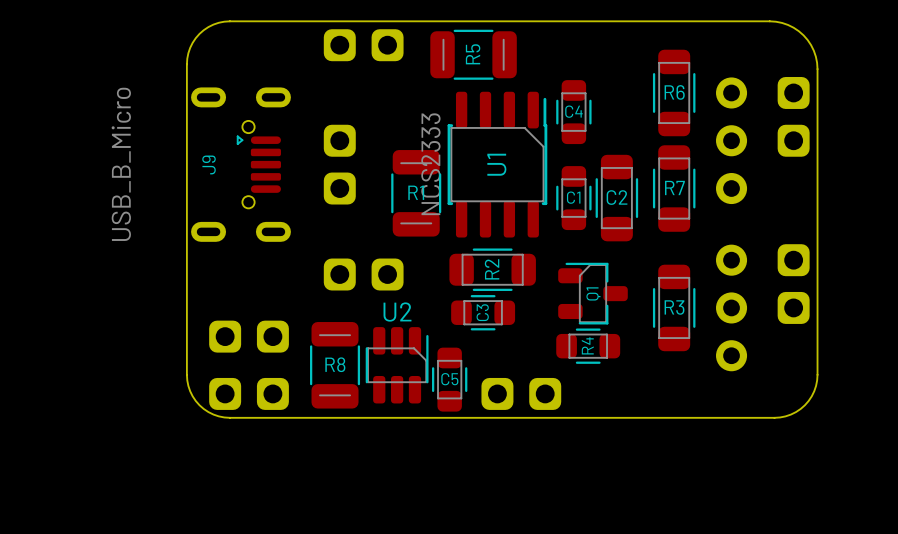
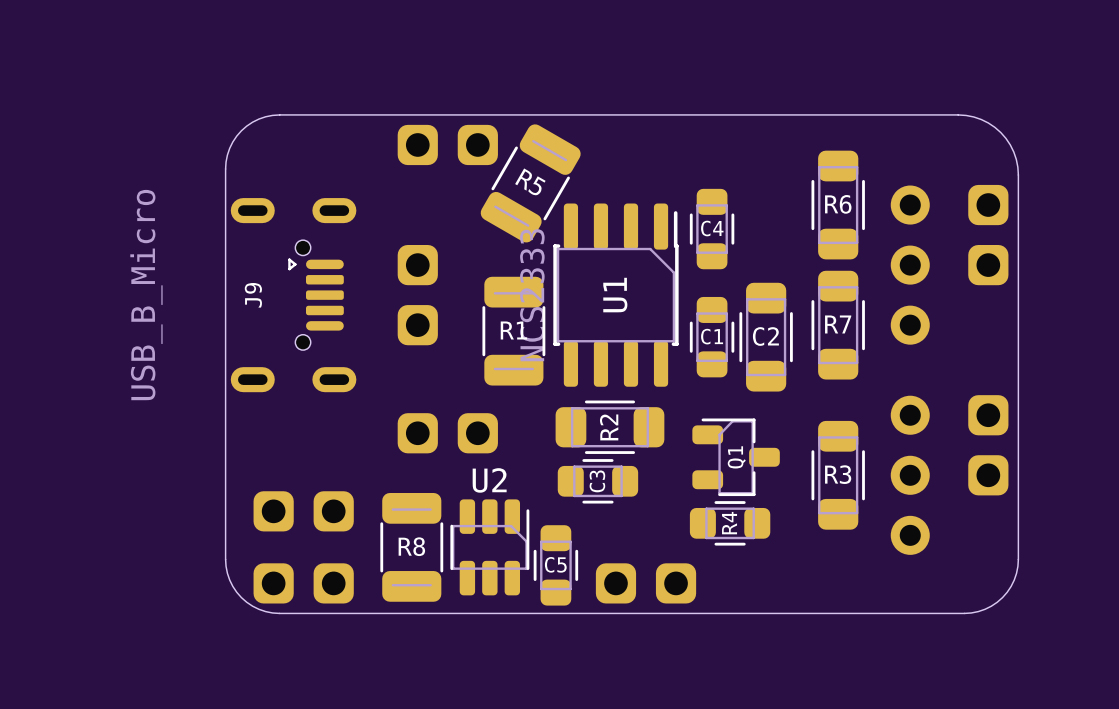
R5 rotation: 0° (473, 54) -> 60° counterclockwise (530, 183)

